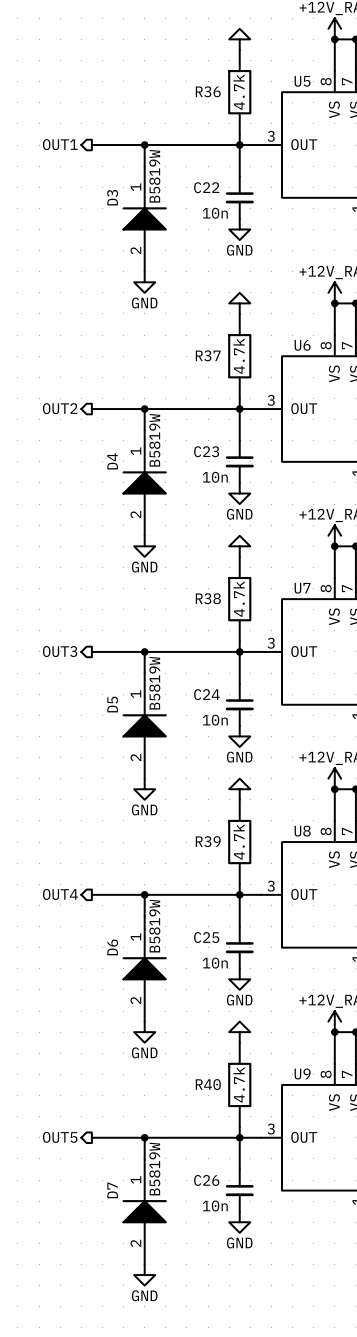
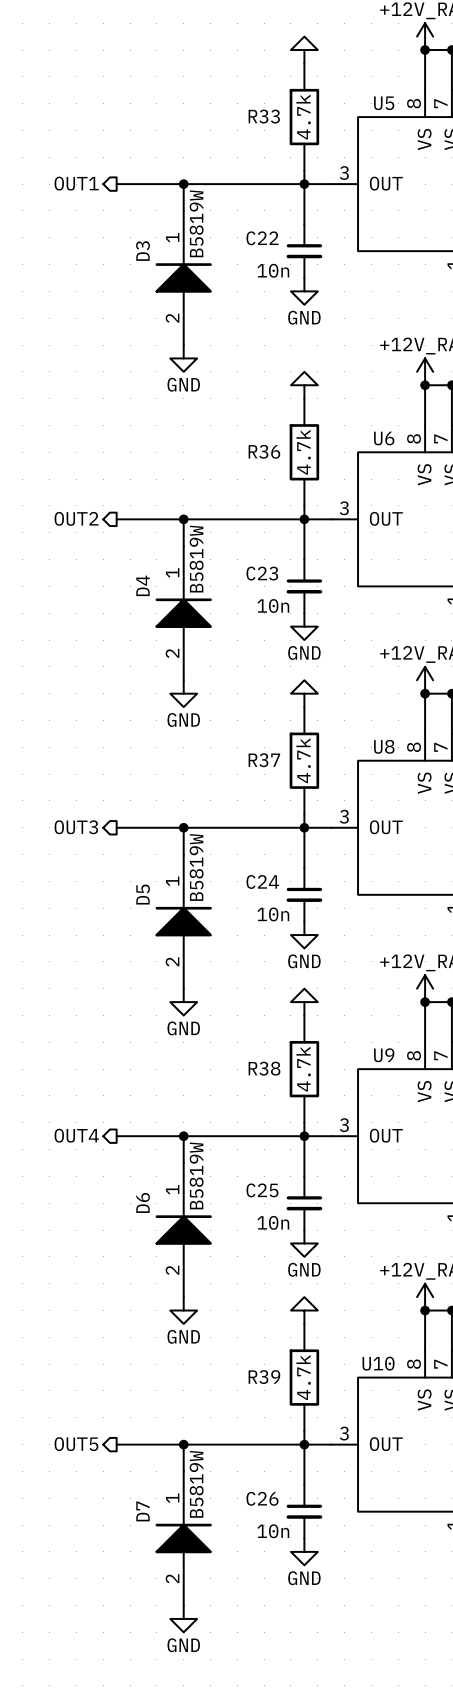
R36 name: R36 (208, 91) -> R33 (264, 116)
R37 name: R37 (208, 355) -> R36 (264, 451)
U7 name: U7 (302, 588) -> U8 (384, 746)
R38 name: R38 (208, 598) -> R37 (264, 760)
U8 name: U8 (302, 831) -> U9 (384, 1055)
R39 name: R39 (208, 841) -> R38 (264, 1068)
U9 name: U9 (302, 1073) -> U10 (378, 1363)
R40 name: R40 (208, 1084) -> R39 (264, 1377)

